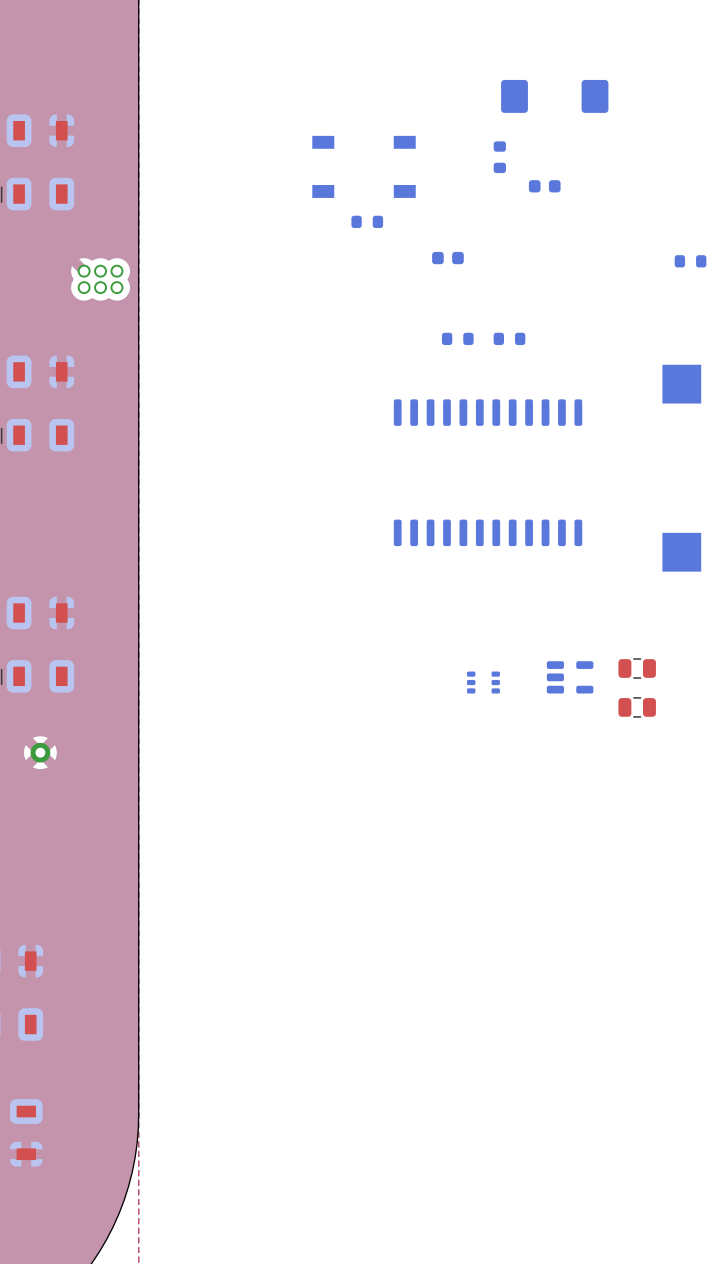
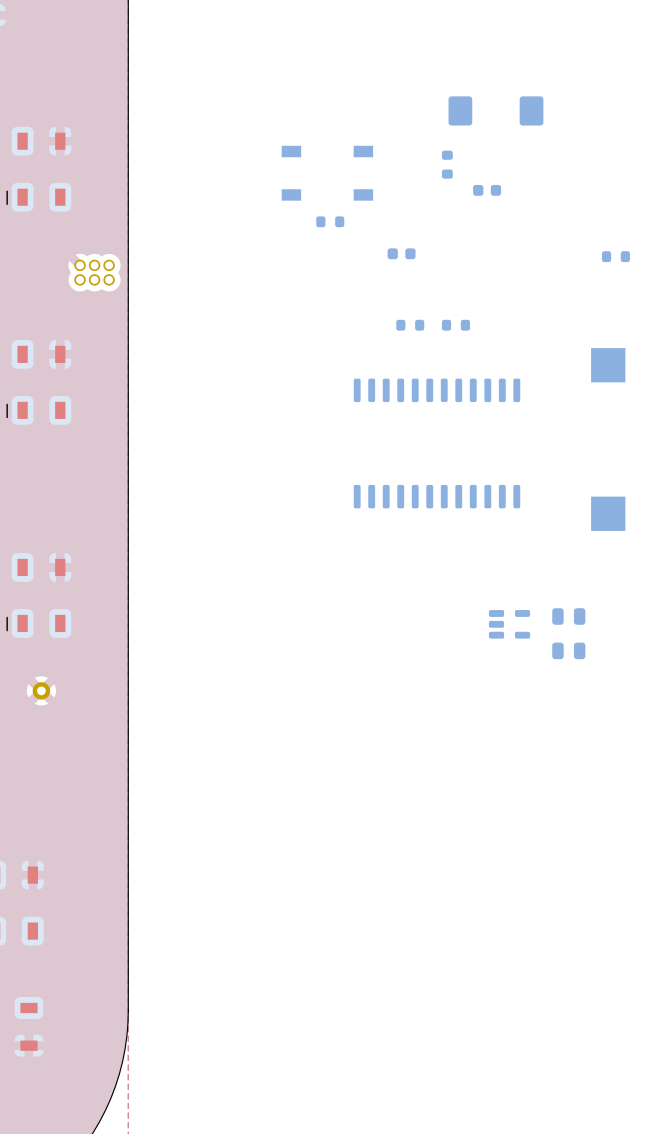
part side: top (637, 668) -> bottom (568, 616)
part: (483, 682) -> none
part side: top (637, 707) -> bottom (568, 650)

